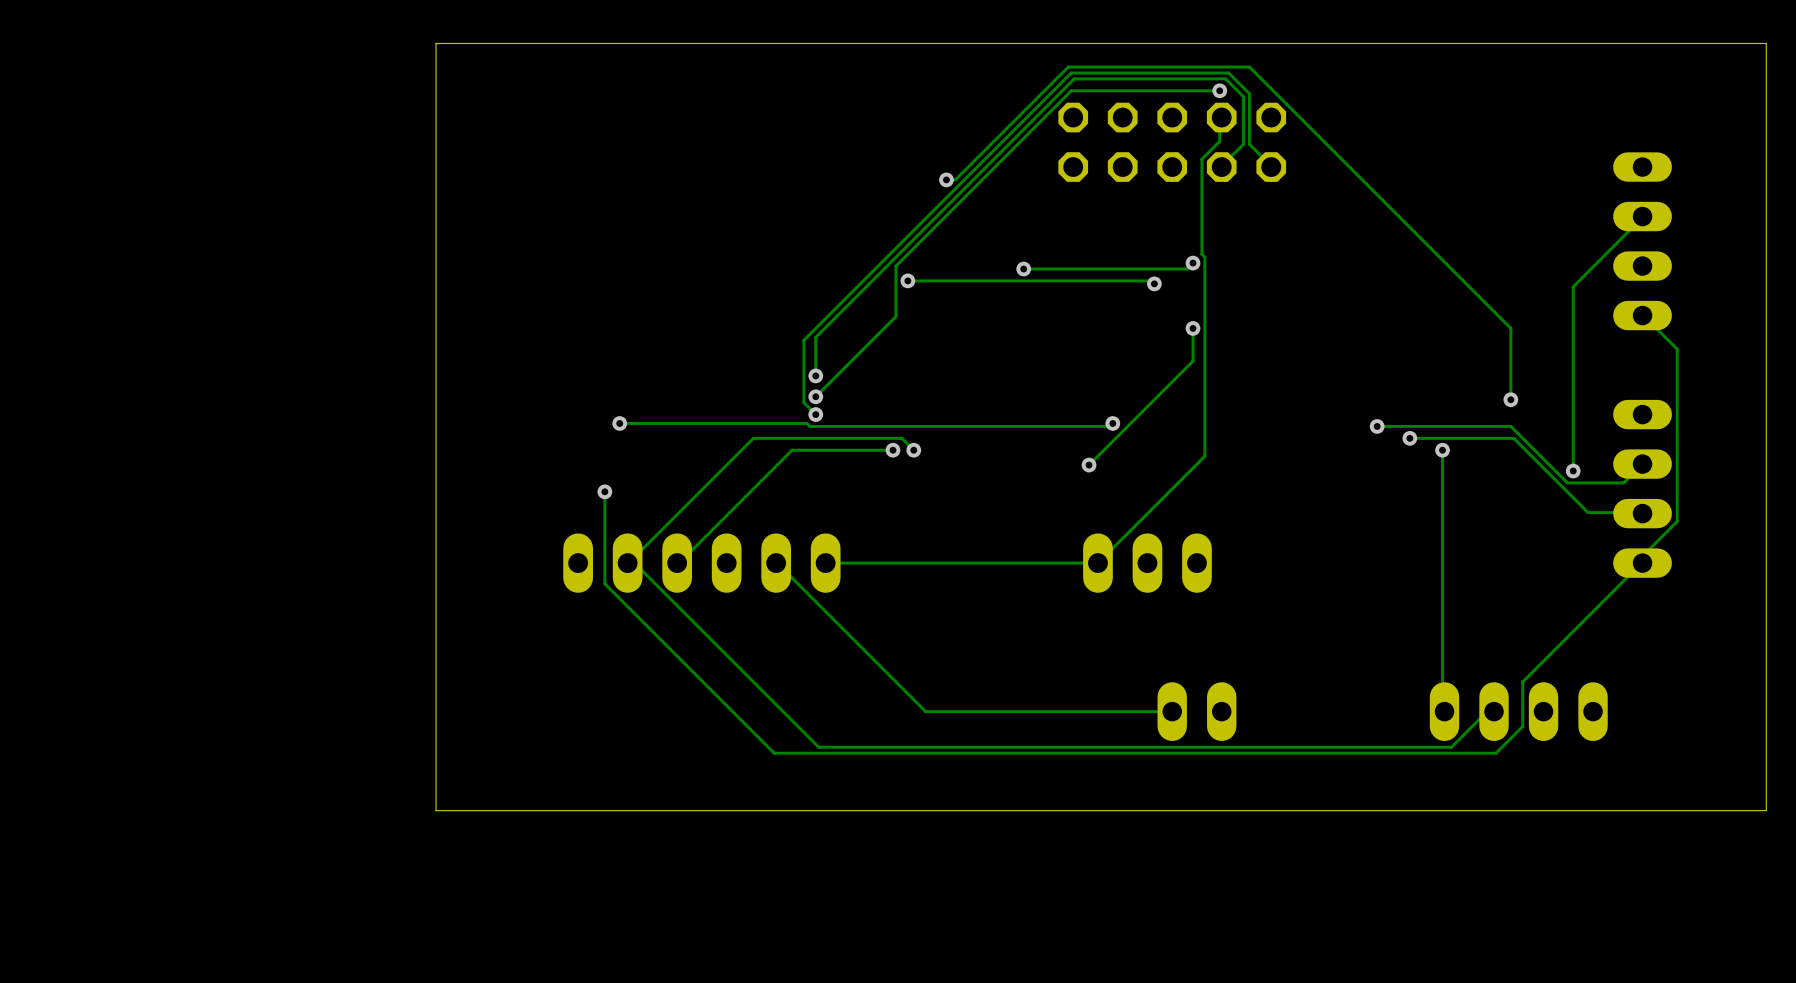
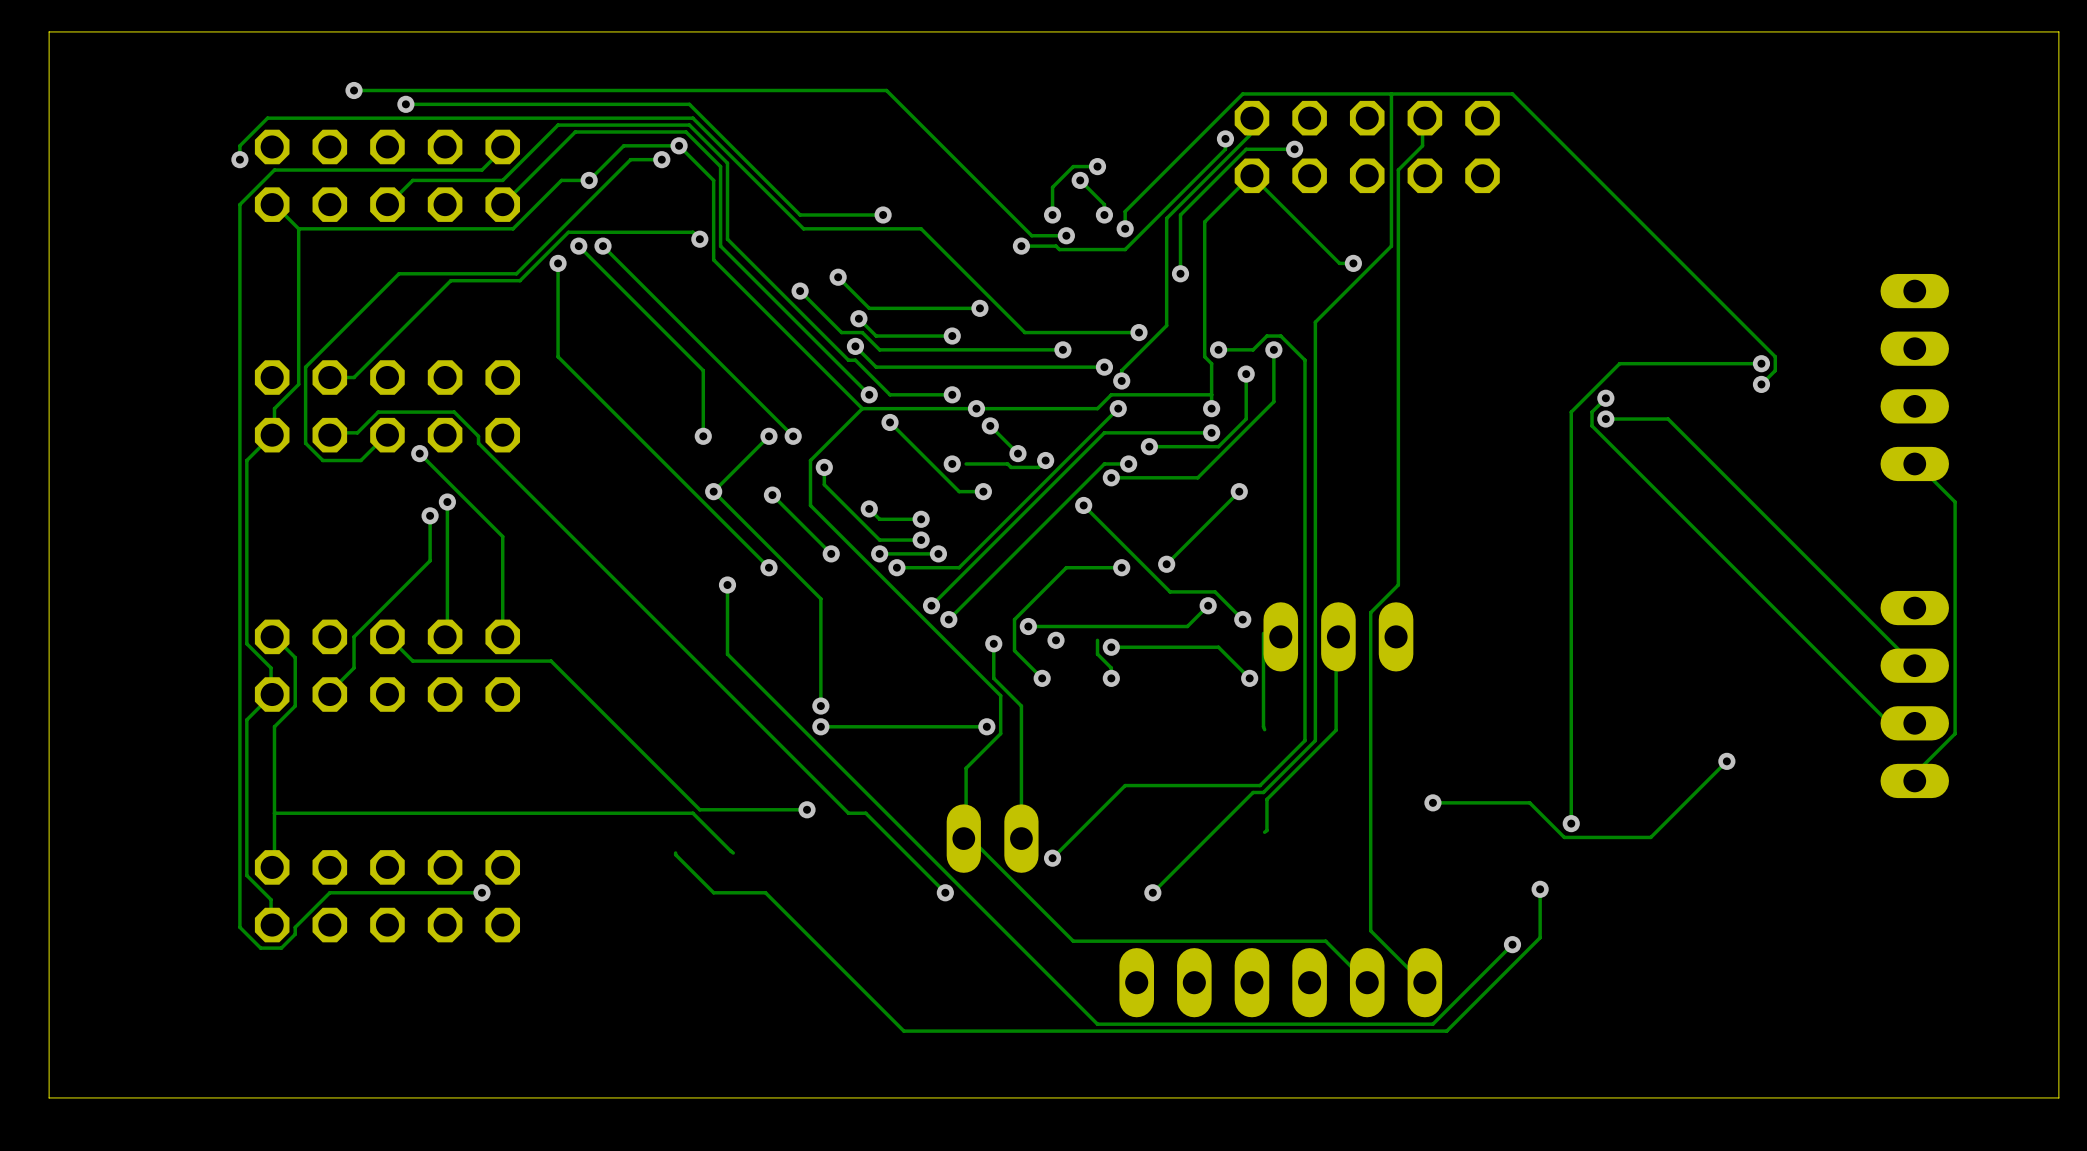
board edge: (436, 43) (436, 810) (1766, 810) -> (510, 31) (49, 31) (49, 1097) (2058, 1097) (2058, 925)
track: (1219, 90) (1071, 90) (1065, 96) -> (1761, 384) (1775, 370) (1775, 356) (1512, 93) (1242, 93)
via: (1219, 90) -> none
track: none -> (354, 90) (886, 90) (1031, 235) (1066, 235)
via: none -> (354, 90)
track: none -> (1391, 93) (1391, 246) (1315, 322) (1315, 740) (1263, 792) (1253, 792) (1152, 892)
track: none -> (405, 104) (689, 104) (800, 214) (883, 214)
via: none -> (405, 104)
track: none -> (1251, 118) (1249, 118) (1249, 135) (1166, 218) (1166, 325) (1121, 370) (1121, 380)
track: none -> (1225, 138) (1225, 149) (1125, 249) (1059, 249) (1056, 246) (1021, 246)
via: none -> (1225, 138)
via: none -> (679, 145)
track: none -> (502, 146) (502, 149) (481, 170) (274, 170) (239, 204) (239, 927) (260, 948) (281, 948) (295, 934) (295, 927) (329, 892) (481, 892)
track: none -> (1294, 149) (1246, 149) (1180, 214) (1180, 273)
via: none -> (1294, 149)
track: none -> (239, 159) (239, 145) (267, 118) (692, 118) (803, 228) (921, 228) (1024, 332) (1139, 332)
via: none -> (239, 159)
track: none -> (661, 159) (630, 159) (516, 273) (398, 273) (305, 367) (305, 443) (322, 460) (360, 460) (387, 435)
via: none -> (661, 159)
track: none -> (1097, 166) (1073, 166) (1052, 187) (1052, 214)
via: none -> (1097, 166)
track: (1201, 159) (1201, 254) (1204, 257) (1204, 456) (1097, 563) (825, 563) -> (1401, 166) (1398, 170) (1398, 585) (1370, 612) (1370, 930) (1422, 982) (1424, 982)
part: none -> (387, 175)
track: (1221, 167) (1243, 144) (1243, 96) (1225, 78) (1074, 78) (815, 337) (815, 375) -> none
track: (1271, 167) (1249, 144) (1249, 93) (1228, 72) (1071, 72) (803, 340) (803, 402) (815, 414) -> none
via: none -> (589, 180)
track: none -> (1080, 180) (1104, 204) (1104, 214)
via: none -> (1080, 180)
track: (946, 179) (955, 179) (1068, 67) (1249, 67) (1510, 328) (1510, 399) -> none
via: (946, 179) -> none
track: none -> (272, 204) (274, 204) (298, 228)
track: none -> (387, 204) (412, 180) (502, 180) (558, 125) (689, 125) (727, 163) (727, 239) (848, 360) (855, 360) (890, 394) (952, 394)
track: none -> (502, 204) (575, 132) (686, 132) (720, 166) (720, 246) (869, 394)
track: (964, 197) (895, 266) (895, 316) (815, 396) -> (1125, 211) (1125, 228)
via: none -> (883, 214)
via: none -> (1052, 214)
via: none -> (1104, 214)
track: none -> (298, 228) (513, 228) (561, 180) (589, 180) (623, 145) (679, 145) (713, 180) (713, 259) (862, 408)
track: none -> (298, 228) (298, 384) (274, 408) (274, 432) (246, 460) (246, 643) (271, 668) (272, 694) (246, 719) (246, 875) (271, 899) (272, 925)
via: none -> (1125, 228)
track: (1642, 216) (1573, 286) (1573, 471) -> none
via: none -> (1066, 235)
track: none -> (699, 239) (692, 232) (568, 232) (520, 280) (450, 280) (354, 377) (329, 377)
via: none -> (699, 239)
track: none -> (578, 246) (703, 370) (703, 436)
via: none -> (578, 246)
track: none -> (603, 246) (793, 436)
via: none -> (603, 246)
via: none -> (1021, 246)
part: (1642, 241) -> none
track: none -> (558, 263) (558, 356) (768, 567)
via: none -> (558, 263)
track: none -> (1353, 263) (1339, 263) (1251, 175) (1204, 221) (1204, 356) (1211, 363) (1211, 408)
via: none -> (1353, 263)
track: none -> (838, 277) (869, 308) (979, 308)
via: none -> (838, 277)
track: (1193, 263) (1187, 269) (1023, 269) -> none
via: (1193, 263) -> none
track: none -> (800, 291) (841, 332) (862, 332) (879, 349) (1062, 349)
via: none -> (800, 291)
via position: (1023, 269) -> (1180, 273)
via: none -> (979, 308)
track: (907, 280) (1151, 280) (1154, 283) -> none
via: (907, 280) -> none
via: (1154, 283) -> none
track: none -> (858, 318) (876, 336) (952, 336)
via: none -> (858, 318)
via: none -> (1139, 332)
via: none -> (952, 336)
track: none -> (855, 346) (876, 367) (1104, 367)
via: none -> (855, 346)
track: (1642, 315) (1677, 349) (1677, 447) -> (1914, 463) (1917, 463) (1955, 502)
via: none -> (1062, 349)
track: none -> (1218, 349) (1253, 349) (1266, 336) (1280, 336) (1304, 360) (1304, 740) (1260, 785) (1125, 785) (1052, 858)
via: none -> (1218, 349)
via: none -> (1273, 349)
track: (1193, 328) (1193, 361) (1089, 465) -> none
via: (1193, 328) -> none
track: none -> (1761, 363) (1619, 363) (1571, 412) (1571, 823)
via: none -> (1761, 363)
via: none -> (1104, 367)
track: none -> (1246, 374) (1246, 419) (1218, 446) (1149, 446)
via: none -> (1246, 374)
part: none -> (1914, 377)
via: none -> (1121, 380)
via: none -> (1761, 384)
via: none -> (869, 394)
via: none -> (952, 394)
track: none -> (1211, 394) (1111, 394) (1097, 408) (862, 408)
track: none -> (1605, 398) (1592, 412) (1592, 425) (1889, 723) (1914, 723)
via: none -> (1605, 398)
part: none -> (387, 406)
track: none -> (862, 408) (810, 460) (810, 505) (1000, 695) (1000, 733) (966, 768) (966, 837) (963, 838) (966, 840) (973, 840) (1073, 941) (1325, 941) (1367, 982)
via: none -> (976, 408)
track: none -> (1118, 408) (959, 567) (896, 567)
via: none -> (1118, 408)
via: none -> (1211, 408)
via: (815, 375) -> none
track: none -> (1605, 419) (1668, 419) (1914, 665)
via: none -> (1605, 419)
via: none -> (890, 422)
track: none -> (990, 425) (1017, 453)
via: none -> (990, 425)
track: none -> (1211, 432) (1104, 432) (931, 605)
via: none -> (1211, 432)
track: none -> (329, 435) (329, 432) (357, 432) (378, 412) (454, 412) (478, 436) (478, 443) (848, 813) (865, 813) (945, 892)
via: none -> (703, 436)
track: none -> (768, 436) (713, 491) (820, 598) (820, 706)
via: none -> (768, 436)
via: none -> (793, 436)
via: (815, 396) -> none
via: none -> (1149, 446)
via: (1510, 399) -> none
track: none -> (419, 453) (502, 536) (502, 636)
via: none -> (419, 453)
via: none -> (1017, 453)
track: none -> (1045, 460) (1038, 467) (1011, 467) (1007, 463) (966, 463)
via: none -> (1045, 460)
track: none -> (1128, 463) (1104, 463) (948, 619)
via: none -> (1128, 463)
track: none -> (824, 467) (824, 484) (879, 540) (921, 540)
via: none -> (824, 467)
via position: (619, 423) -> (713, 491)
track: (806, 423) (619, 423) -> (941, 474) (890, 422)
track: (1112, 423) (1109, 426) (1026, 426) -> (1273, 349) (1273, 401) (1197, 477)
via: (1112, 423) -> none
track: (952, 426) (809, 426) -> (959, 491) (945, 477)
via: none -> (1111, 477)
track: (1377, 426) (1510, 426) (1567, 482) (1623, 482) (1642, 464) -> none
via: (1377, 426) -> none
track: (821, 438) (753, 438) (627, 563) (631, 560) (818, 747) (1451, 747) (1487, 711) (1494, 711) -> none
track: (842, 438) (901, 438) (913, 450) -> none
via: none -> (983, 491)
track: none -> (1239, 491) (1166, 564)
via: none -> (1239, 491)
track: (1409, 438) (1513, 438) (1588, 512) (1642, 513) -> none
via: (1409, 438) -> none
track: none -> (772, 495) (831, 553)
via: none -> (772, 495)
track: none -> (447, 502) (447, 636) (445, 636)
via: none -> (447, 502)
track: (893, 450) (792, 450) (677, 563) -> none
via: (893, 450) -> none
via position: (913, 450) -> (1083, 505)
track: none -> (1083, 505) (1170, 591) (1215, 591) (1242, 619)
track: (1442, 450) (1442, 711) (1444, 711) -> none
via: (1442, 450) -> none
track: none -> (869, 508) (879, 519) (921, 519)
via: none -> (869, 508)
track: none -> (430, 515) (430, 560) (354, 636) (354, 668) (329, 692) (329, 694)
via: none -> (430, 515)
via: none -> (921, 519)
via: (1089, 465) -> none
via: (1573, 471) -> none
via: none -> (921, 540)
part: (1642, 488) -> none
track: (604, 491) (604, 583) (774, 753) (1496, 753) (1522, 726) (1522, 681) (1641, 563) (1644, 563) (1644, 554) (1677, 521) -> (1914, 780) (1917, 778) (1917, 771) (1955, 733) (1955, 588)
via: (604, 491) -> none
via: none -> (831, 553)
via: none -> (879, 553)
track: none -> (938, 553) (879, 553)
via: none -> (938, 553)
via: none -> (1166, 564)
via: none -> (768, 567)
via: none -> (896, 567)
track: none -> (1121, 567) (1066, 567) (1014, 619) (1014, 650) (1042, 678)
via: none -> (1121, 567)
track: none -> (727, 585) (727, 654) (1097, 1024) (1432, 1024) (1512, 944)
via: none -> (727, 585)
via: none -> (931, 605)
track: none -> (1208, 605) (1187, 626) (1028, 626)
via: none -> (1208, 605)
via: none -> (948, 619)
via: none -> (1242, 619)
via: none -> (1028, 626)
track: none -> (1263, 633) (1264, 729)
track: none -> (272, 636) (274, 636) (295, 657) (295, 706) (274, 726) (274, 865) (272, 867)
track: none -> (387, 636) (412, 661) (551, 661) (699, 809) (807, 809)
part: (701, 563) -> none
track: (776, 563) (925, 711) (1172, 711) -> none
track: none -> (1338, 636) (1336, 636) (1336, 730) (1266, 799) (1266, 830) (1264, 832)
via: none -> (1056, 640)
track: none -> (1097, 640) (1097, 654) (1111, 668) (1111, 678)
track: none -> (993, 643) (993, 678) (1021, 706) (1021, 838)
via: none -> (993, 643)
track: none -> (1111, 647) (1218, 647) (1249, 678)
via: none -> (1111, 647)
part: none -> (387, 665)
via: none -> (1042, 678)
via: none -> (1111, 678)
via: none -> (1249, 678)
part: none -> (1914, 694)
via: none -> (820, 706)
via: none -> (820, 726)
track: none -> (986, 726) (820, 726)
via: none -> (986, 726)
track: none -> (1726, 761) (1650, 837) (1564, 837) (1529, 802) (1432, 802)
via: none -> (1726, 761)
via: none -> (1432, 802)
via: none -> (807, 809)
part position: (1196, 711) -> (992, 838)
part: (1518, 711) -> none
track: none -> (274, 813) (692, 813) (733, 853)
via: none -> (1571, 823)
track: none -> (675, 853) (713, 892) (765, 892) (903, 1031) (1446, 1031) (1540, 937) (1540, 889)
via: none -> (1052, 858)
via: none -> (1540, 889)
via: none -> (481, 892)
via: none -> (945, 892)
via: none -> (1152, 892)
part: none -> (387, 896)
via: none -> (1512, 944)
part: none -> (1280, 982)

